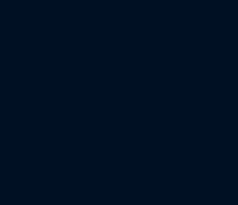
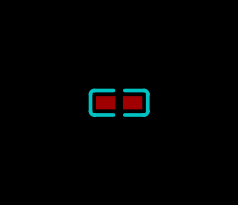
part: none -> (119, 102)

